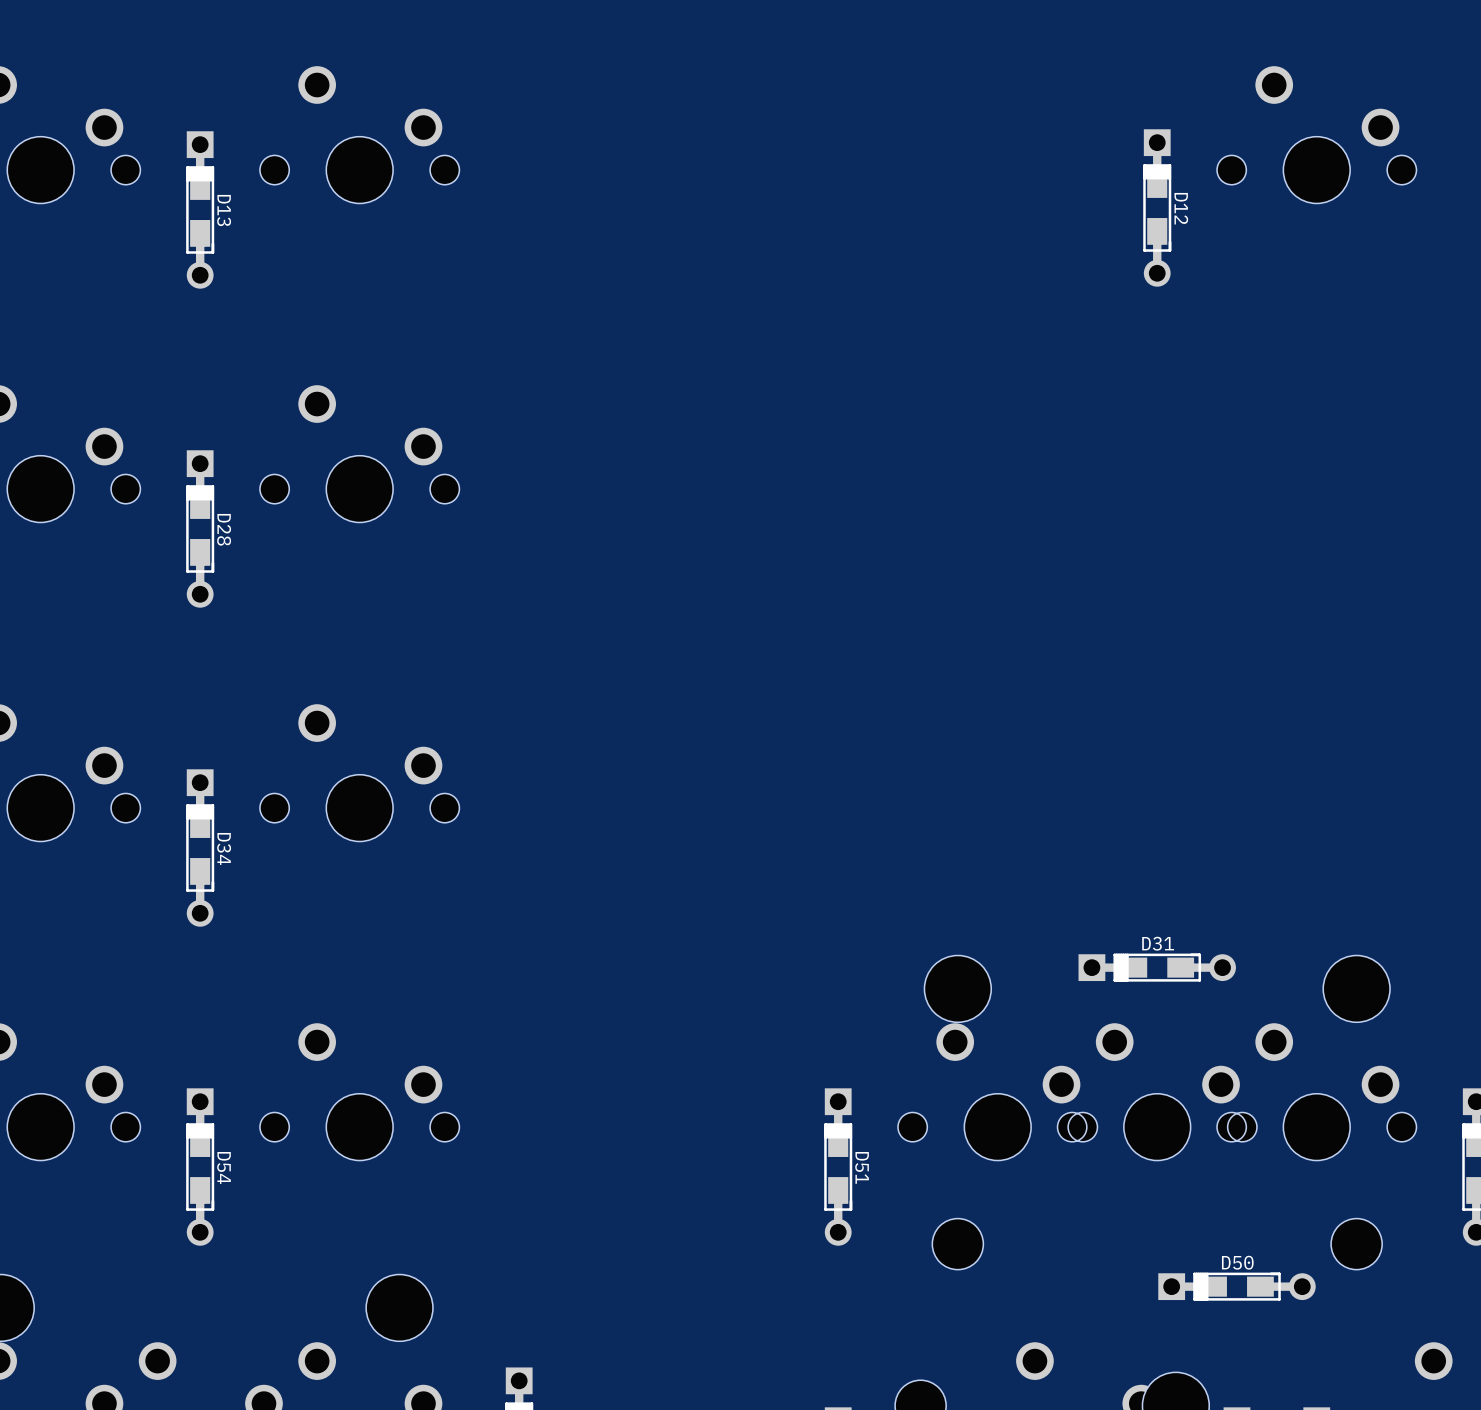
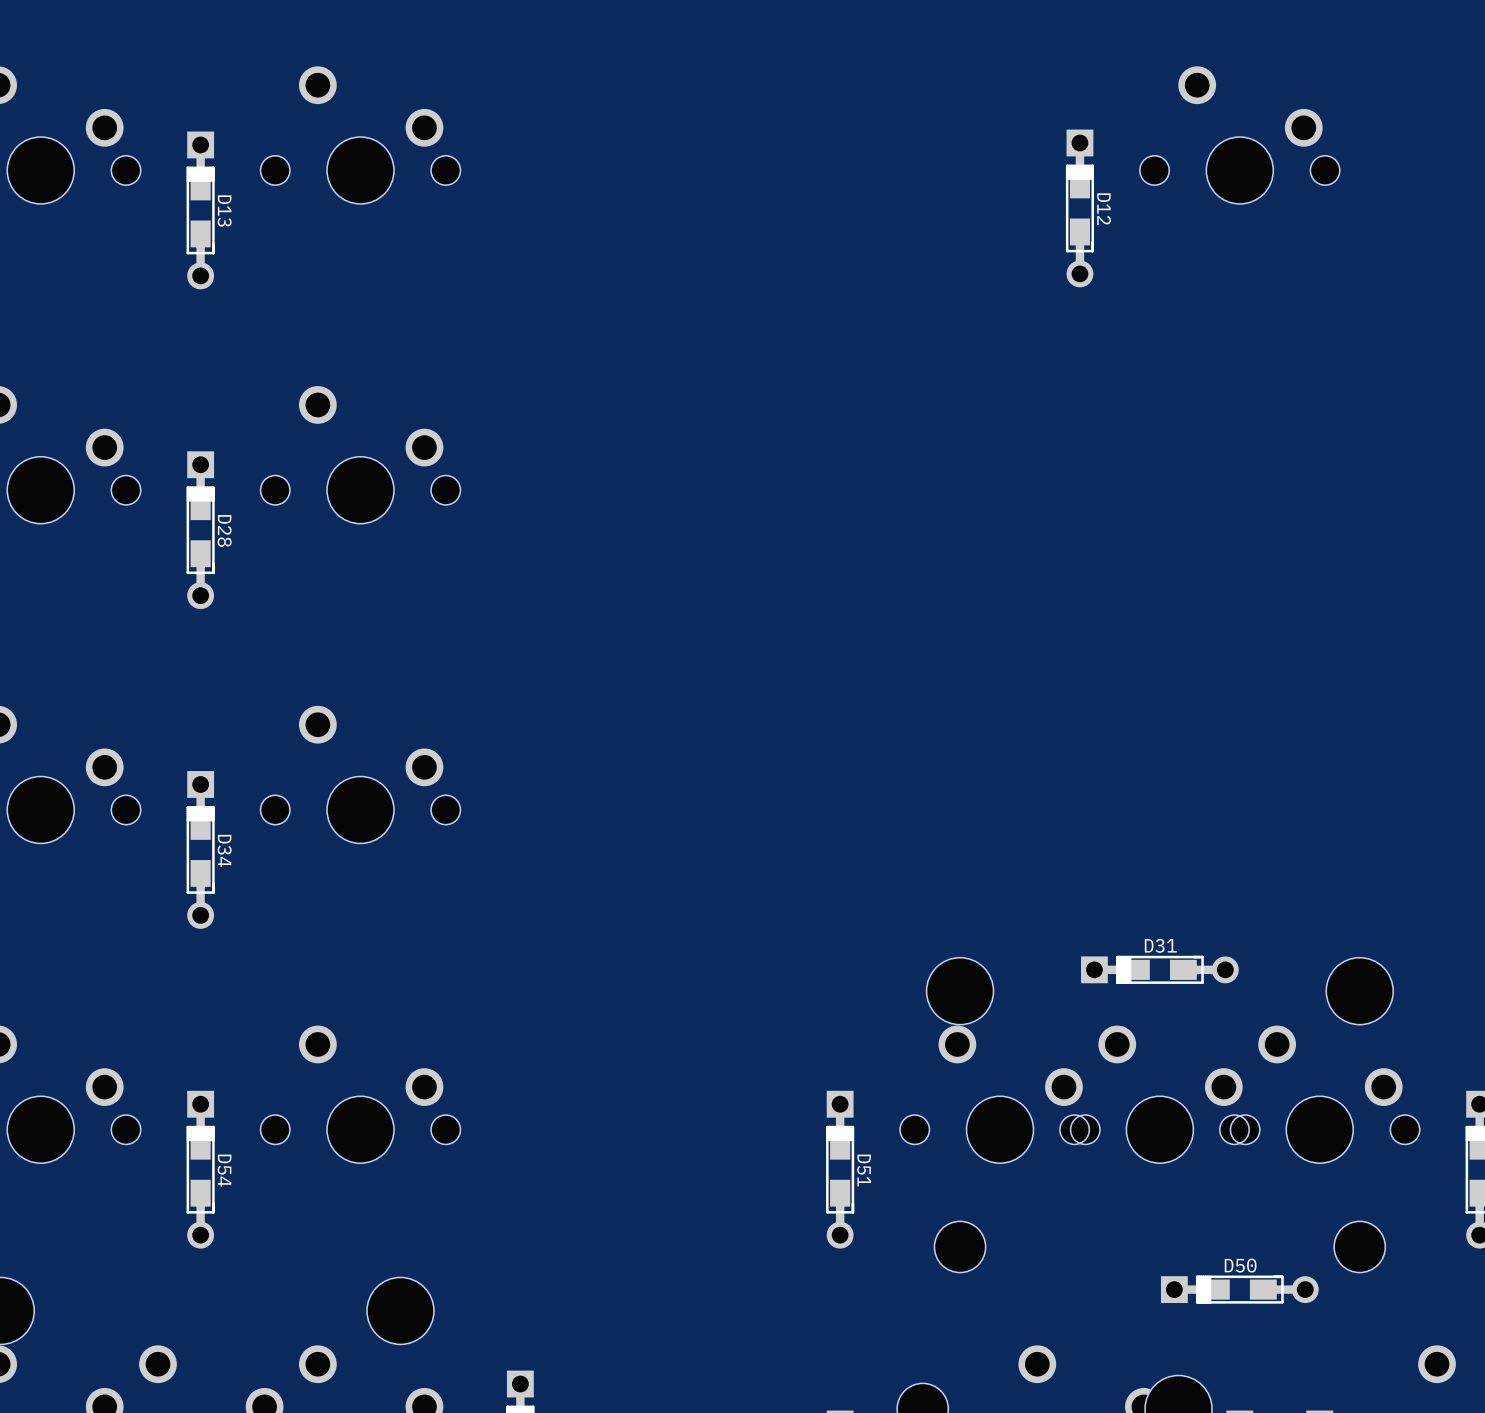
part position: (1316, 134) -> (1239, 135)
D12 position: (1157, 207) -> (1079, 208)

